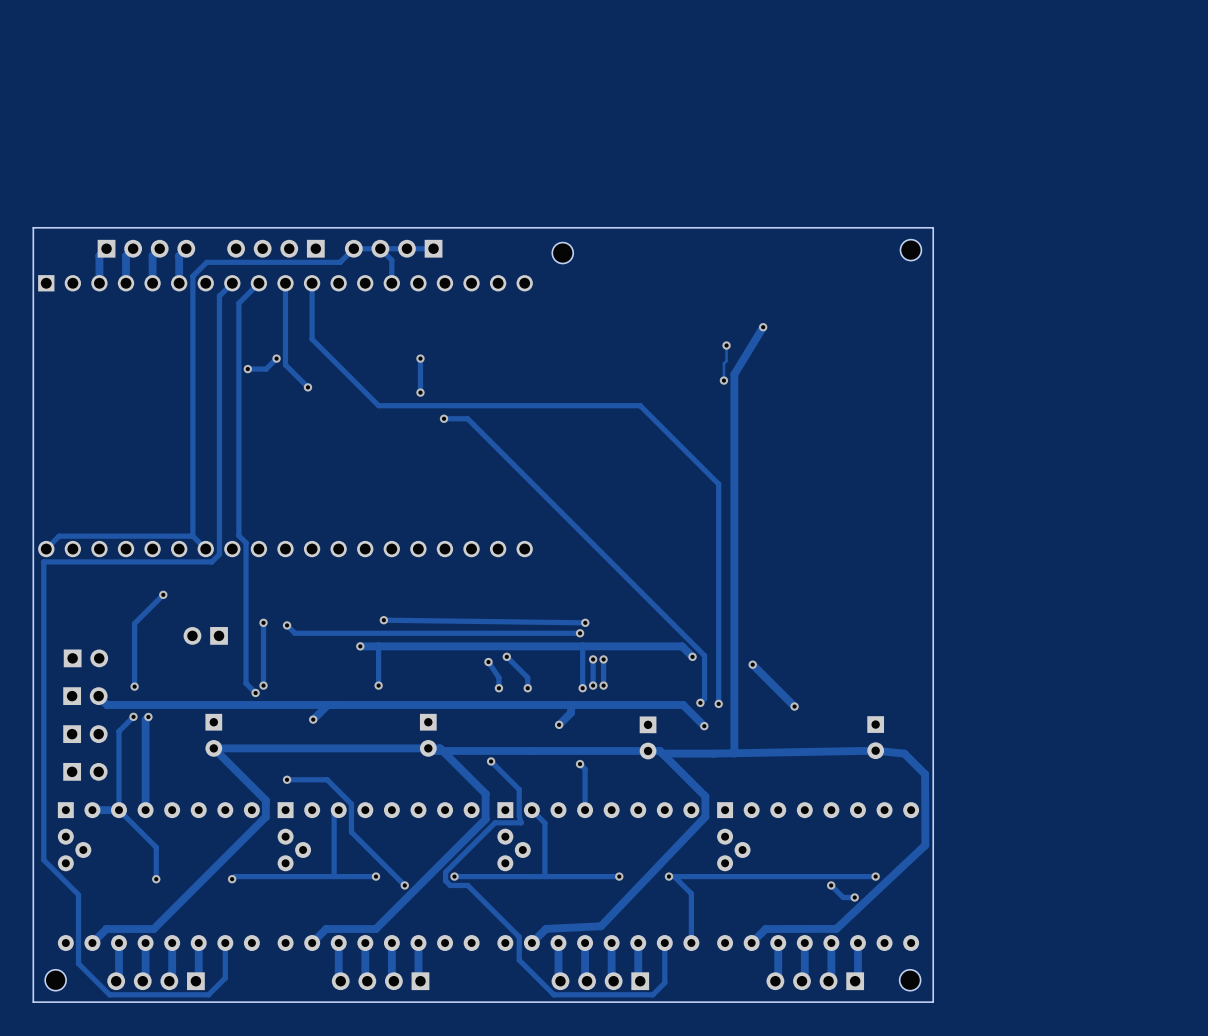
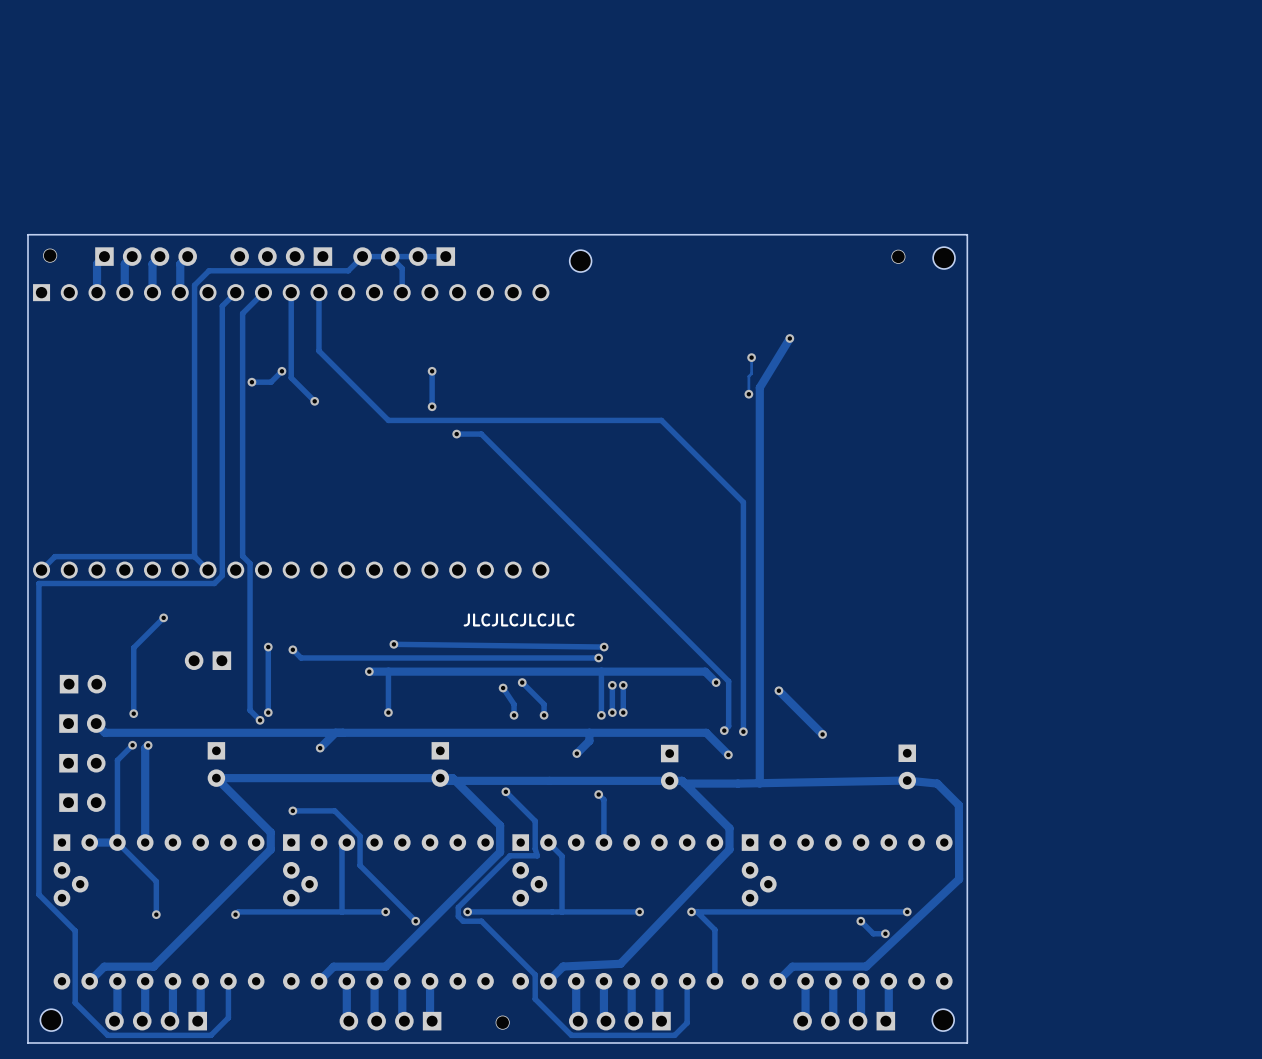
part: none -> (50, 255)
part: none -> (898, 256)
text: none -> JLCJLCJLCJLC (519, 619)
part: none -> (502, 1022)

